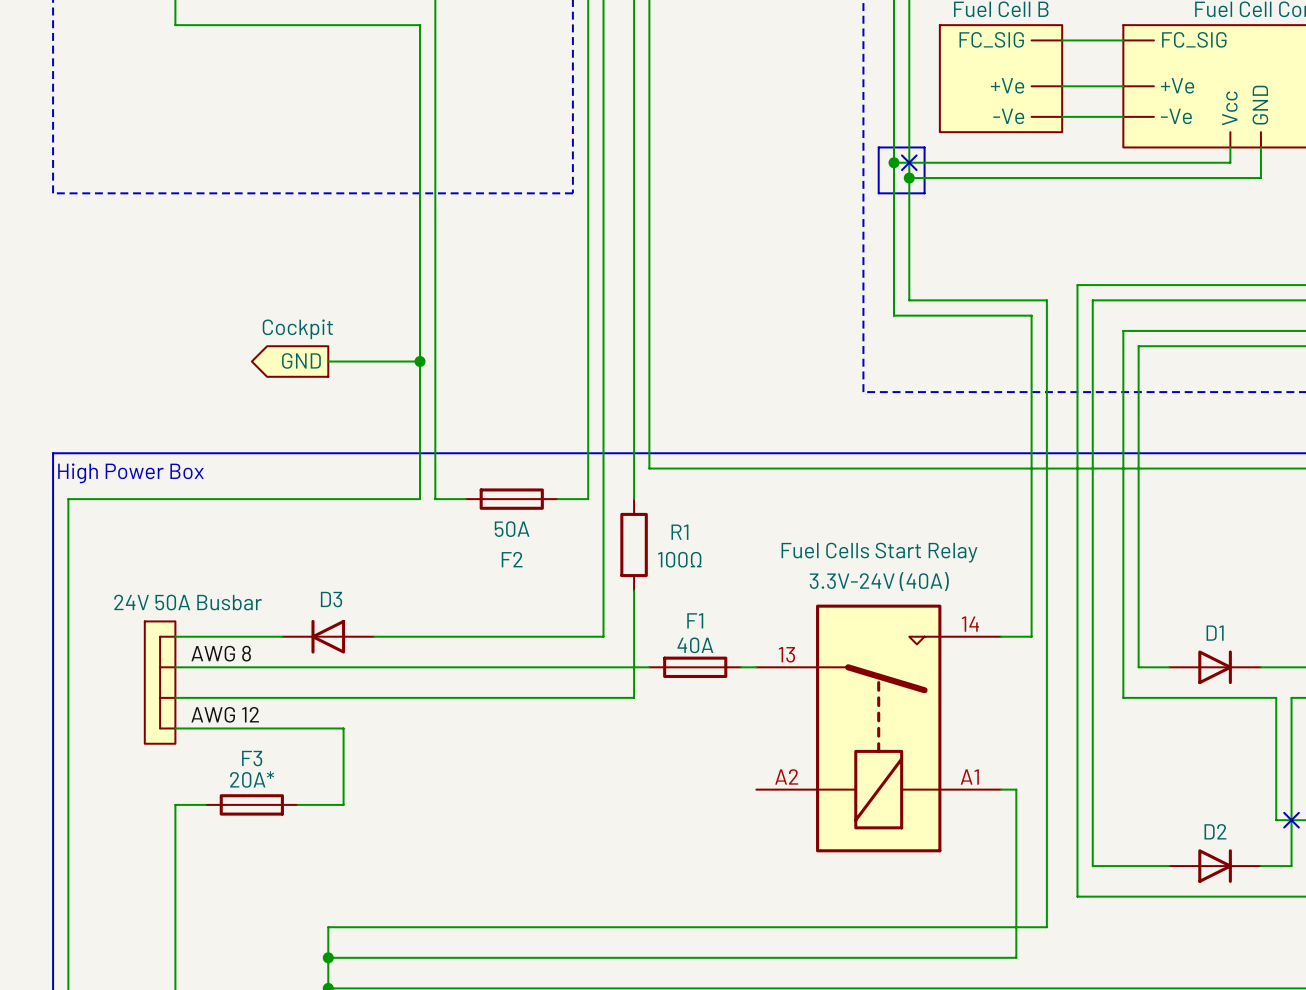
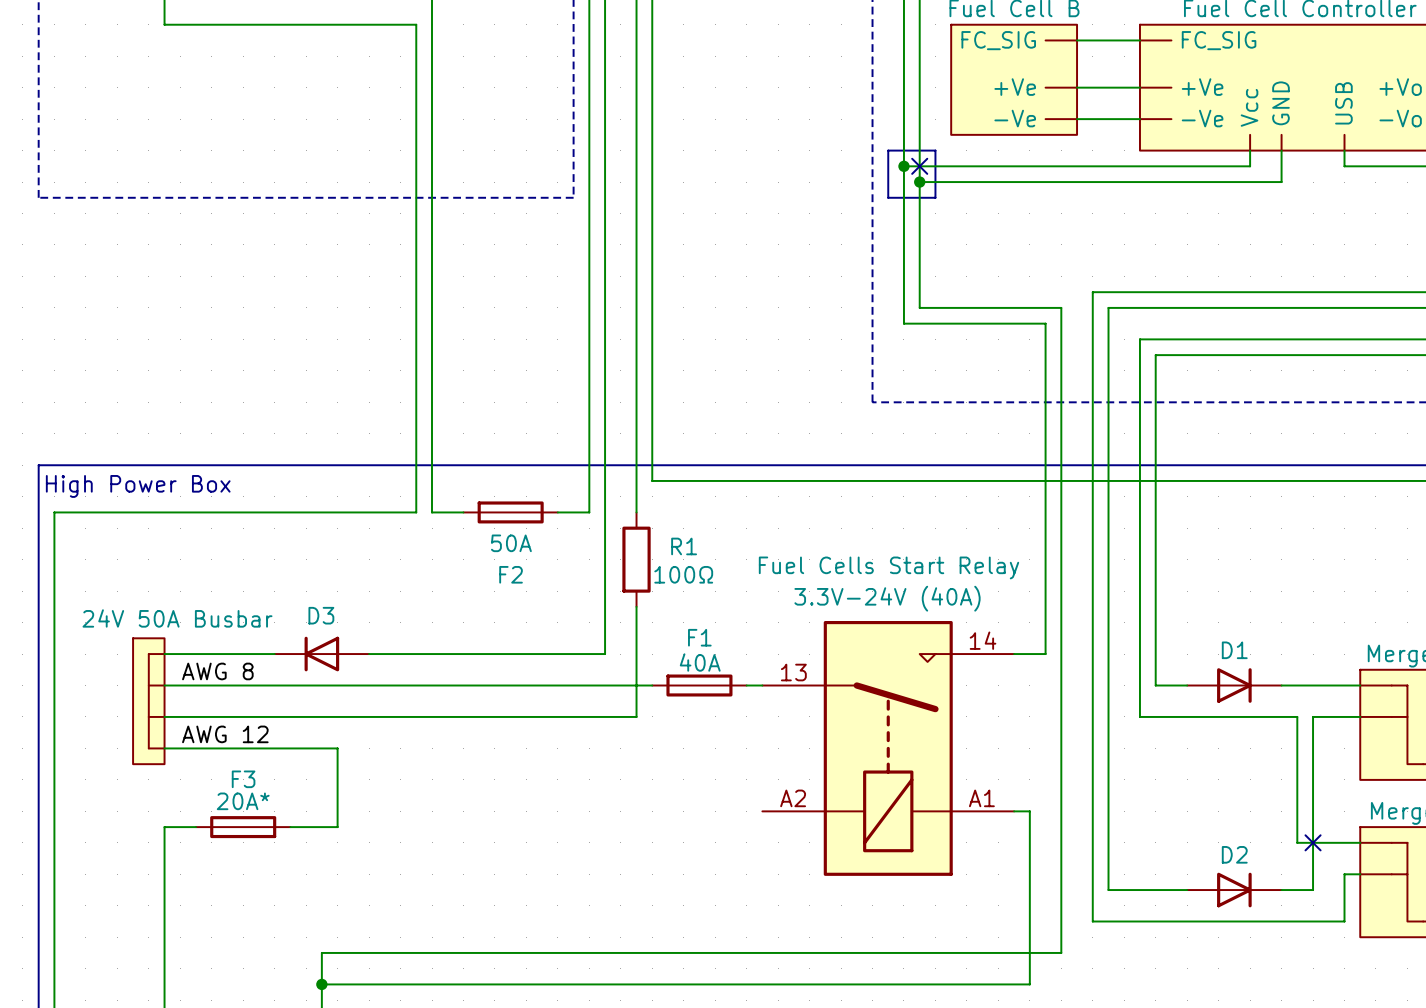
part: (290, 361) -> none
wire: (328, 361) (420, 361) -> none
junction: (420, 361) -> none

